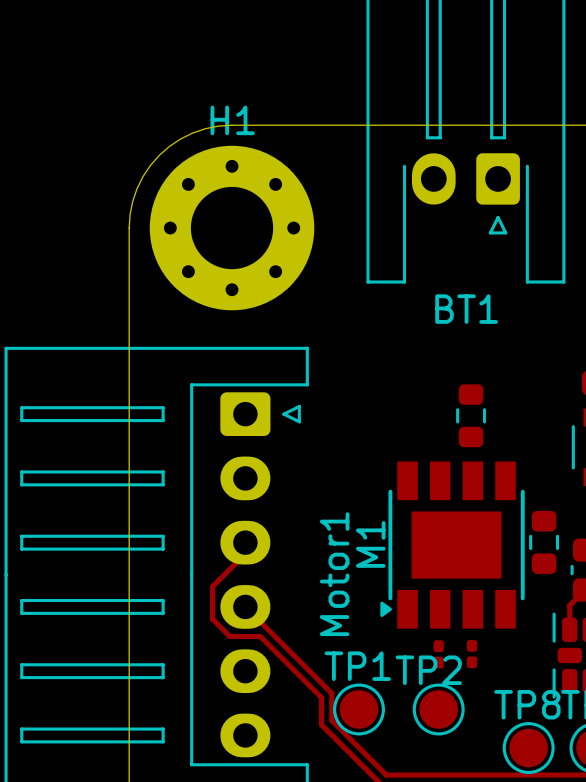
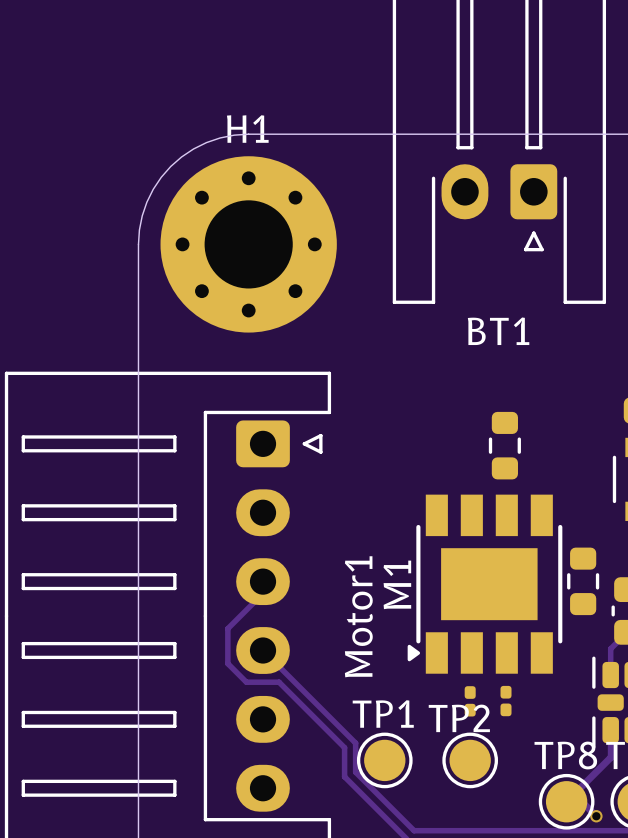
track: none -> (610, 730) (611, 757) (566, 801) (581, 801) (596, 816)
via: none -> (596, 816)

